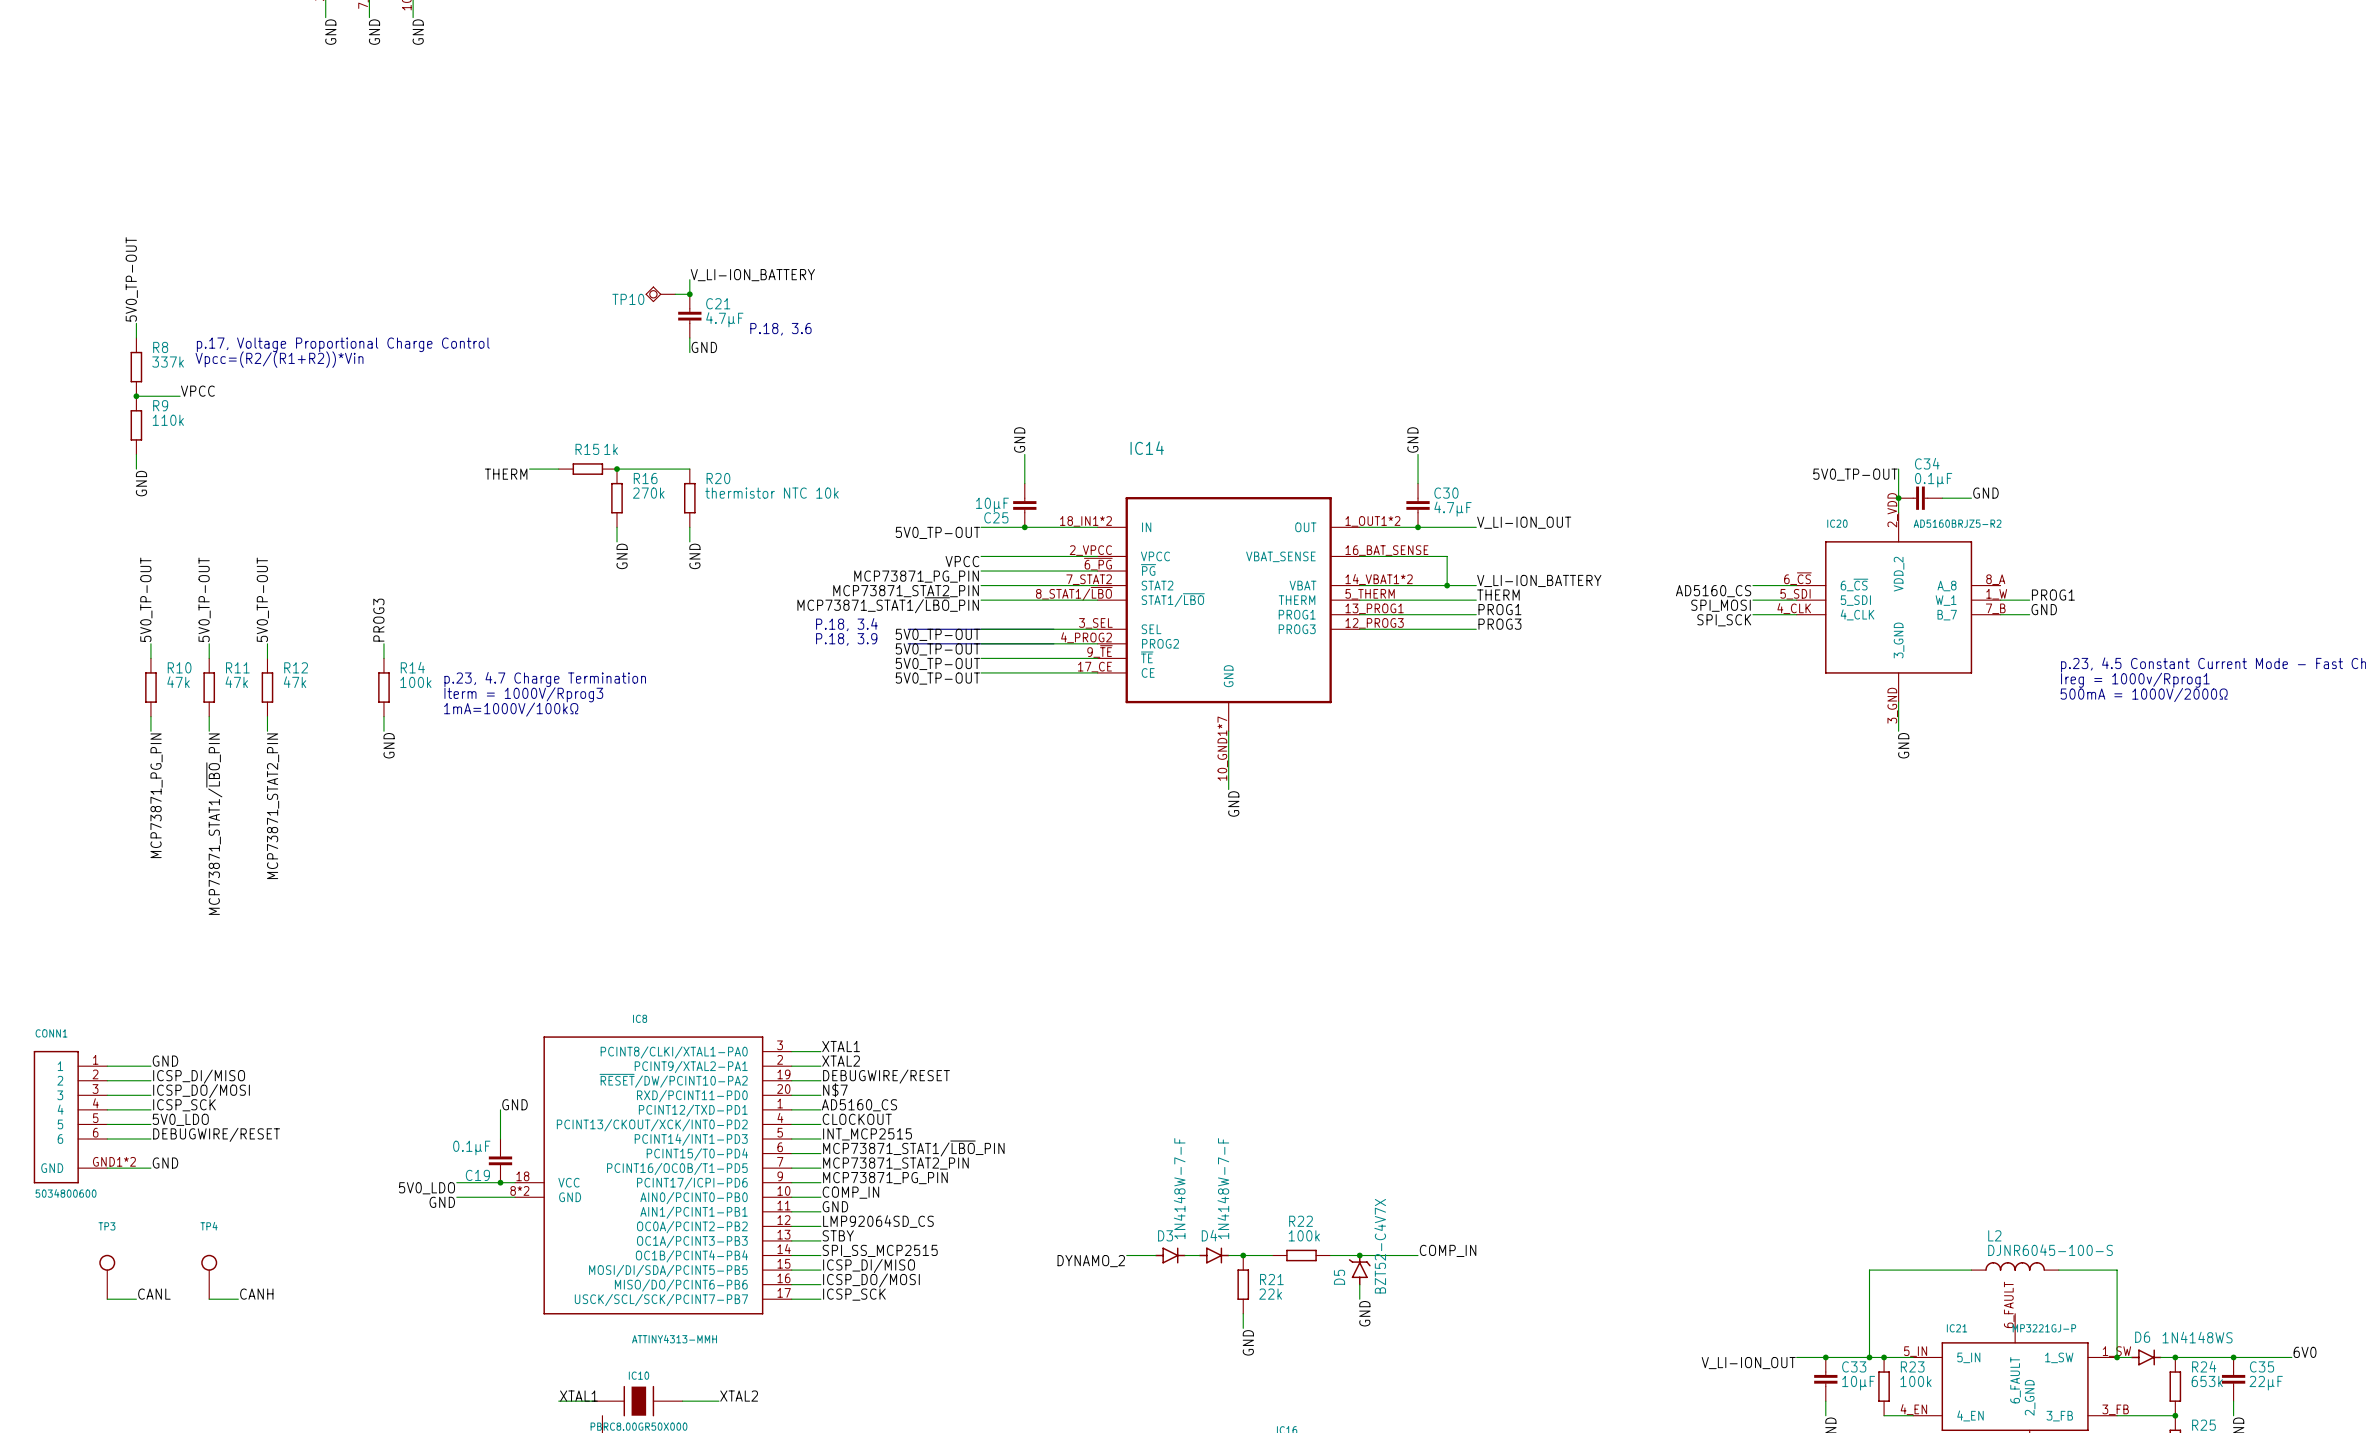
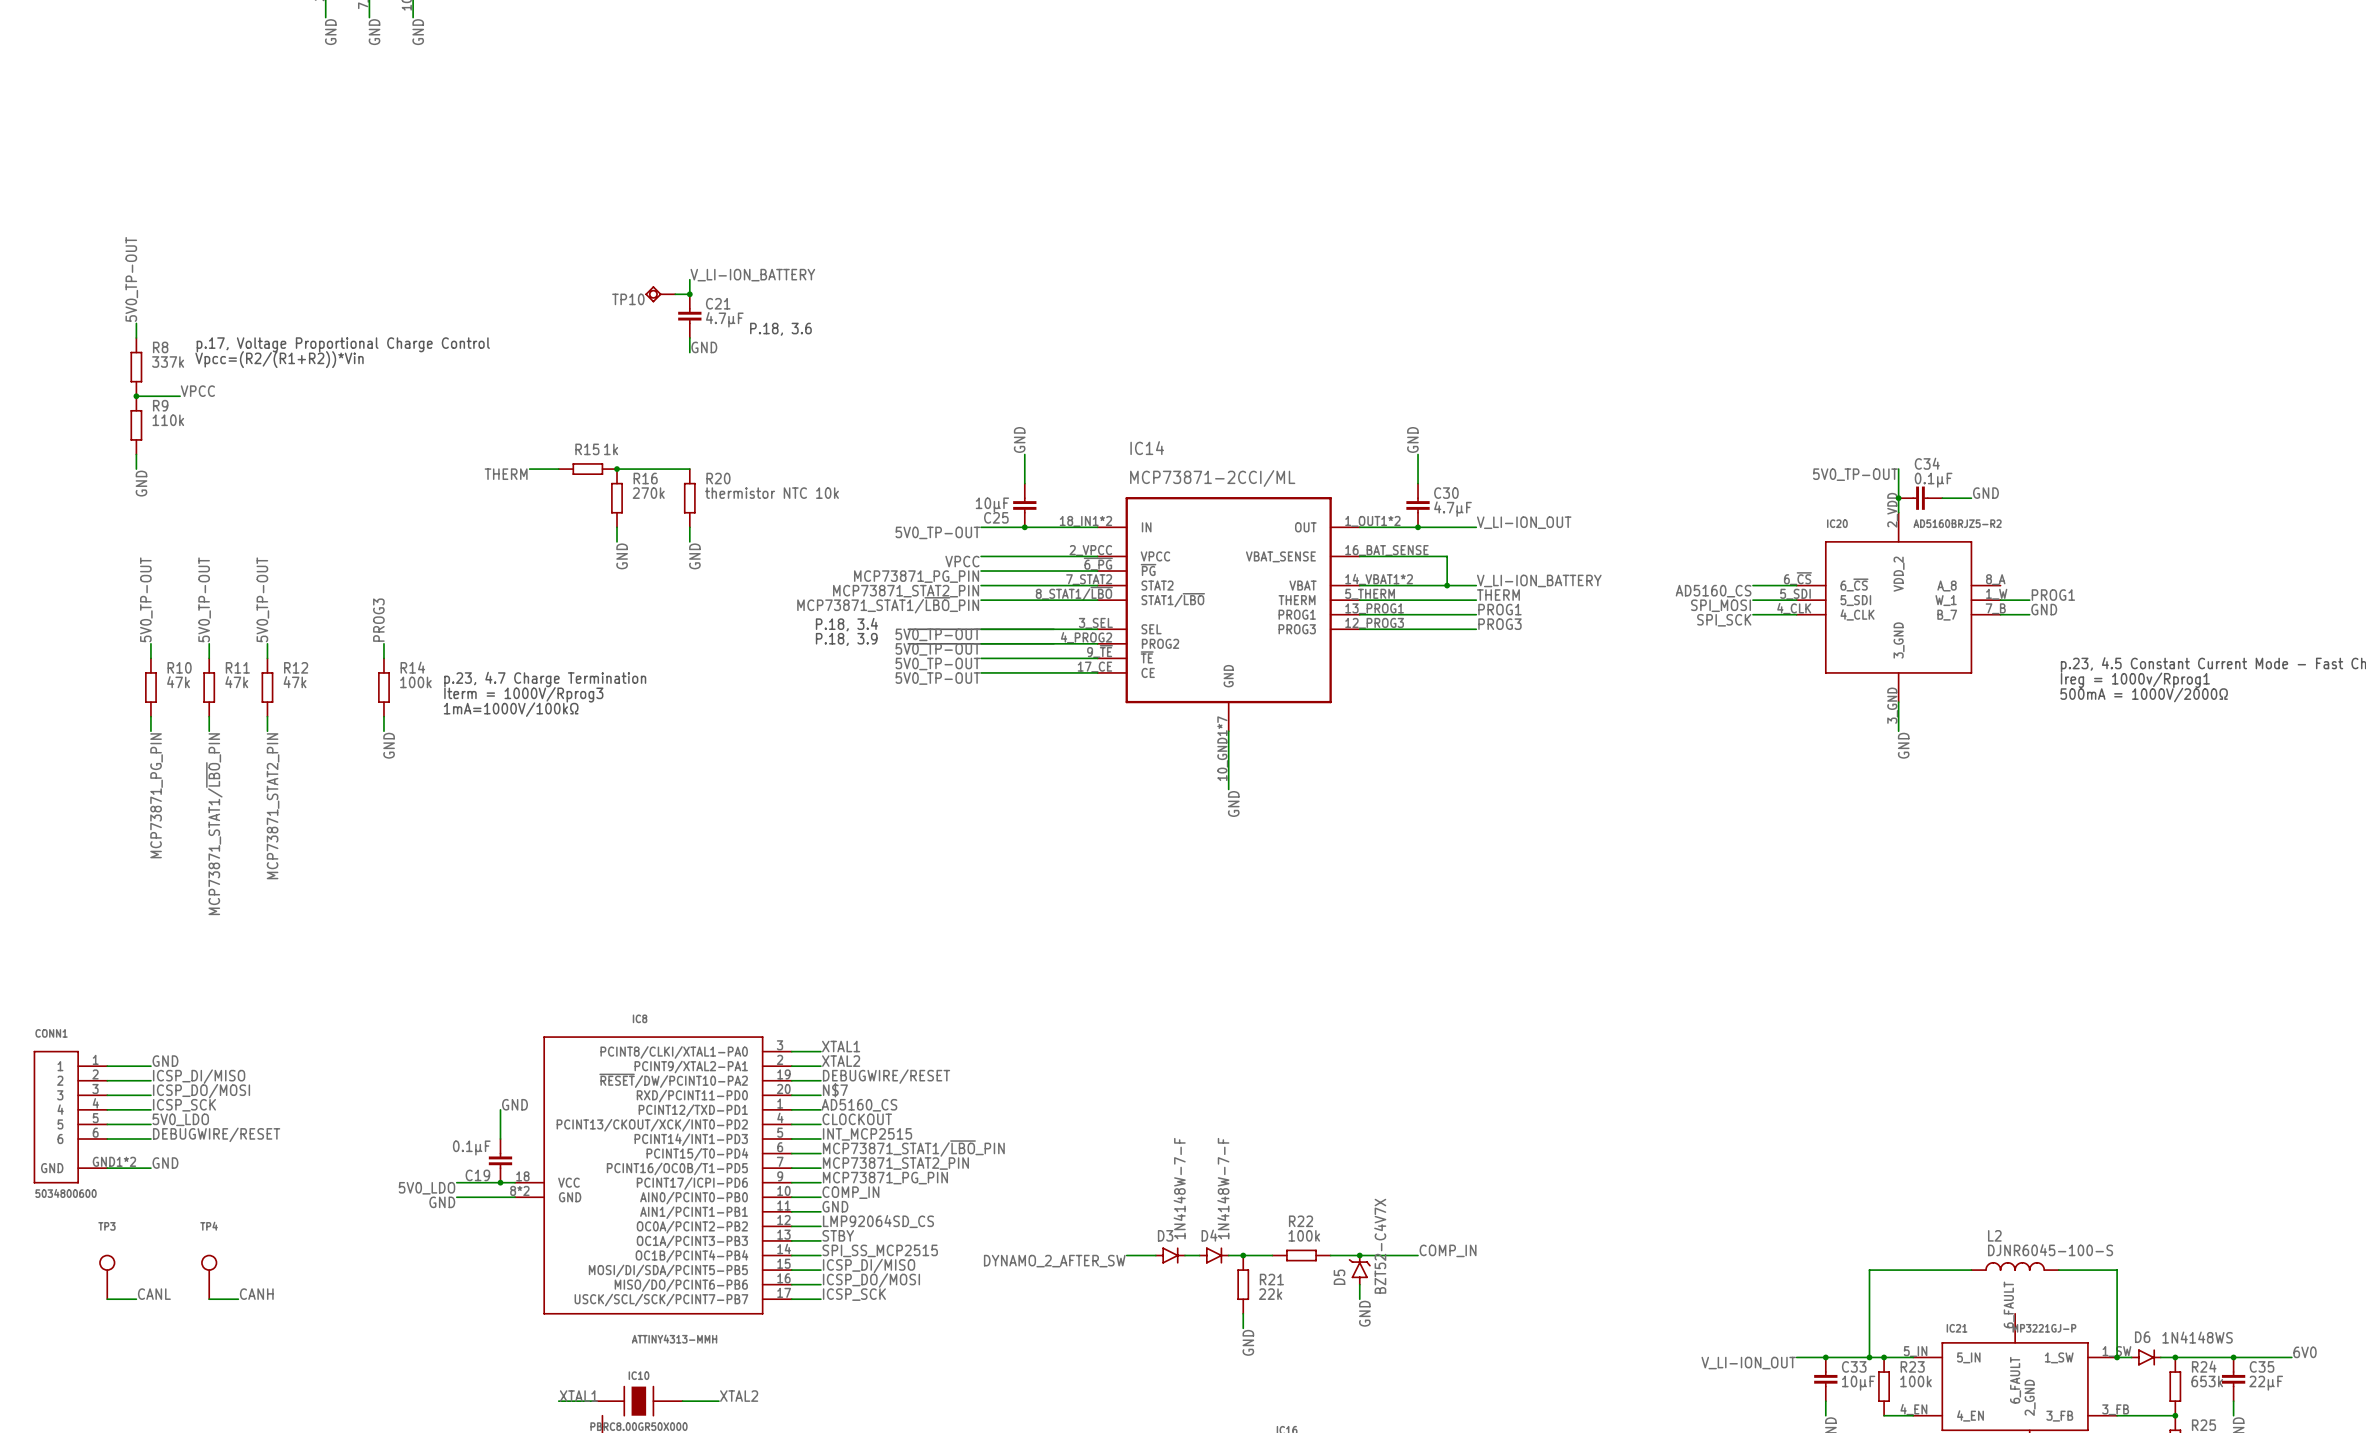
IC14 value: none -> MCP73871-2CCI/ML (1212, 478)
label: DYNAMO_2 (1091, 1261) -> DYNAMO_2_AFTER_SW (1054, 1261)

